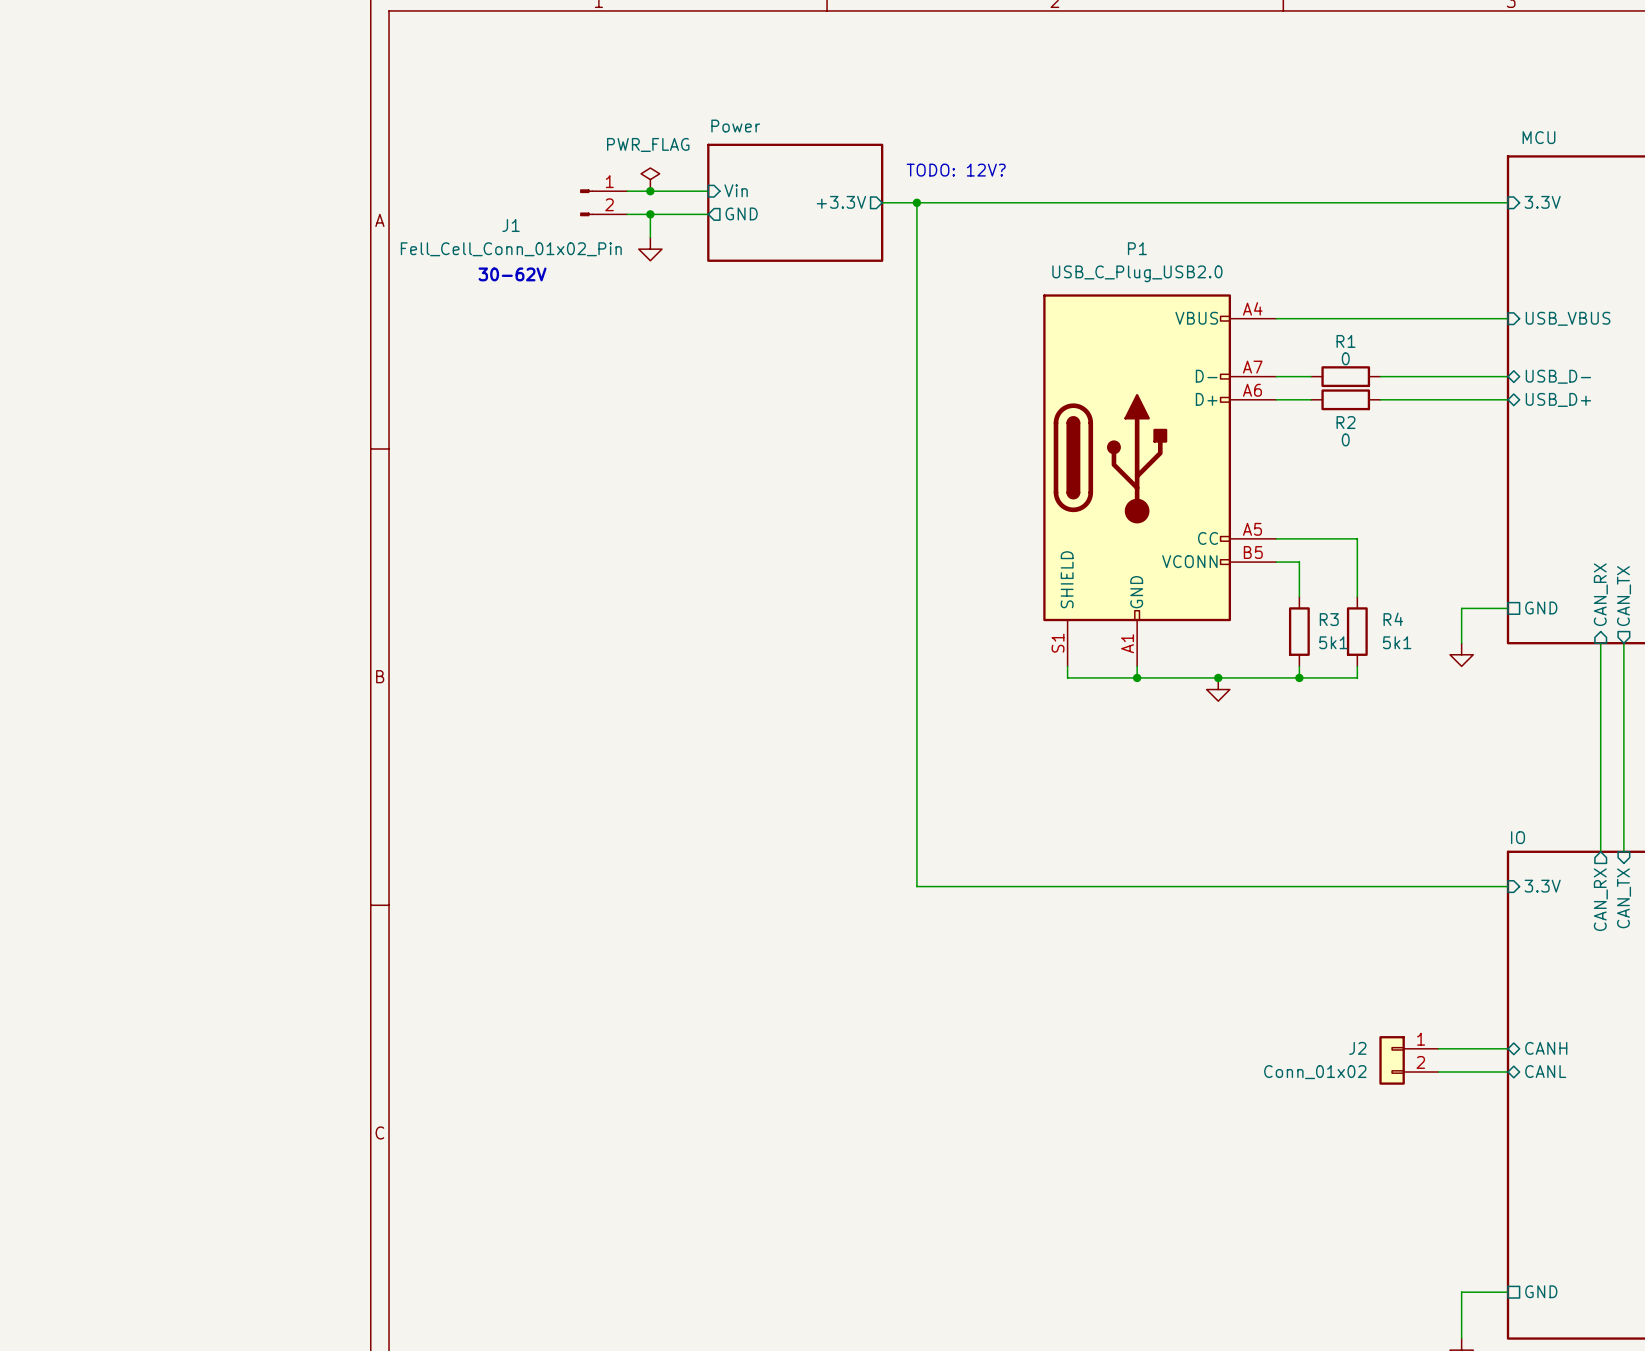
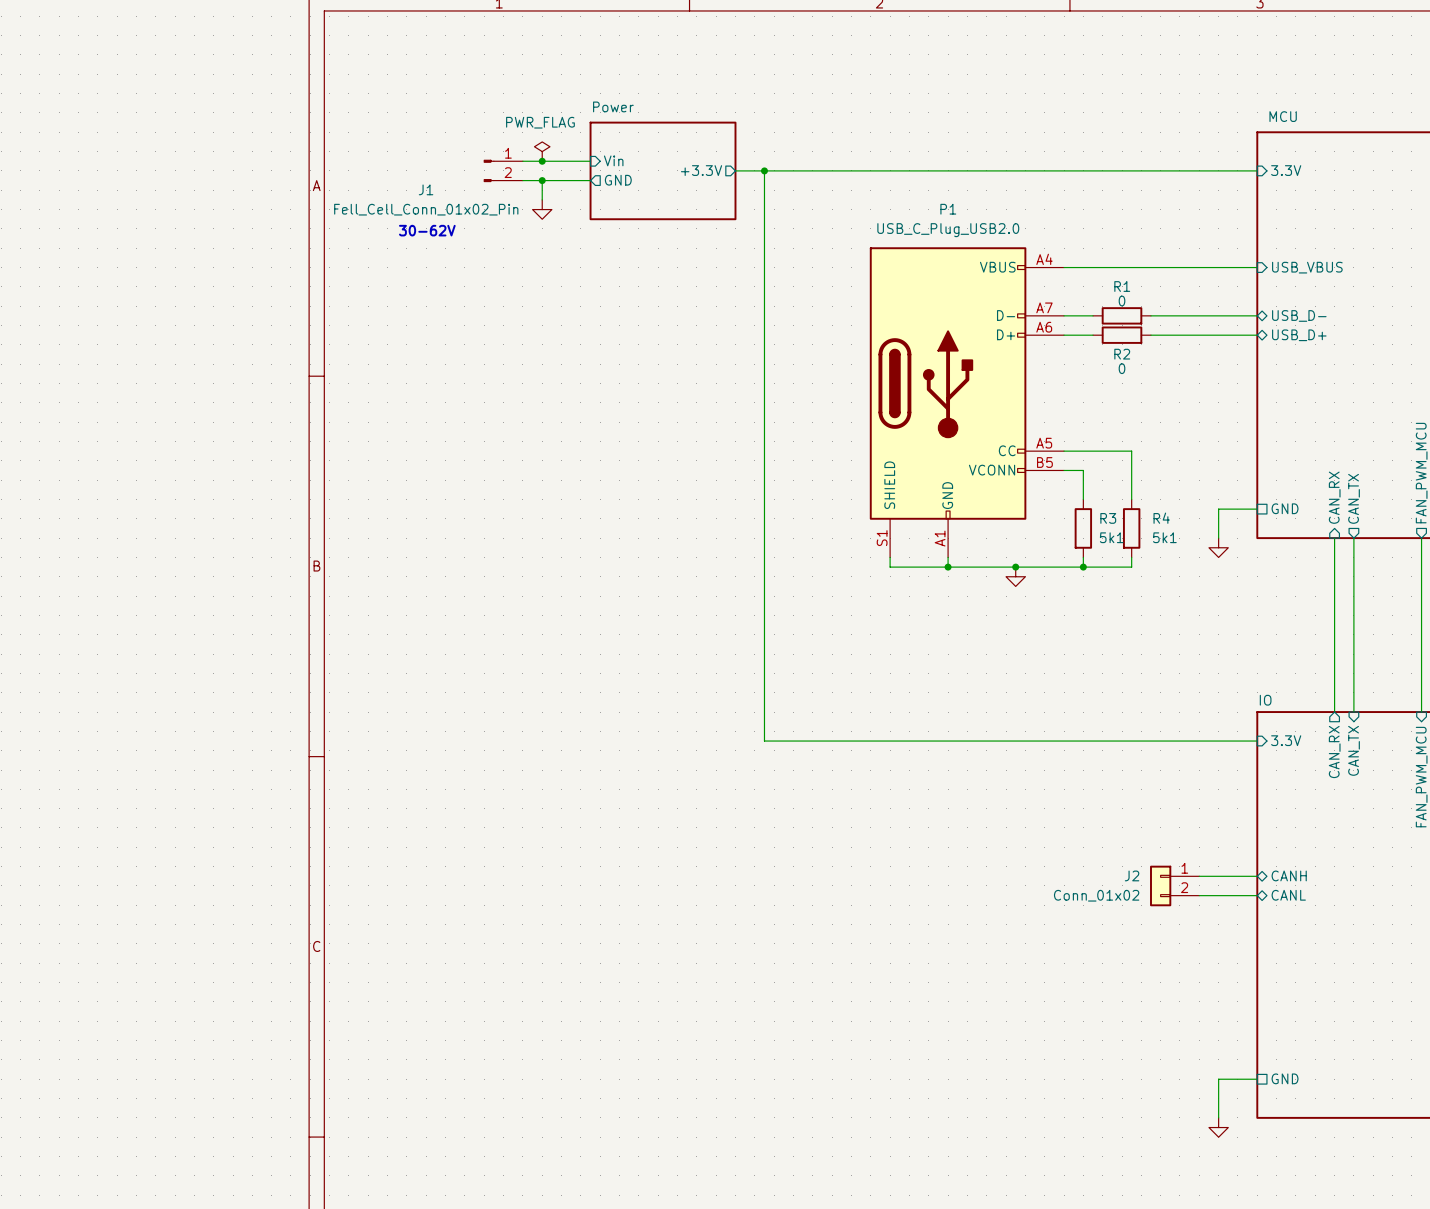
text: TODO: 12V? (956, 170) -> none

